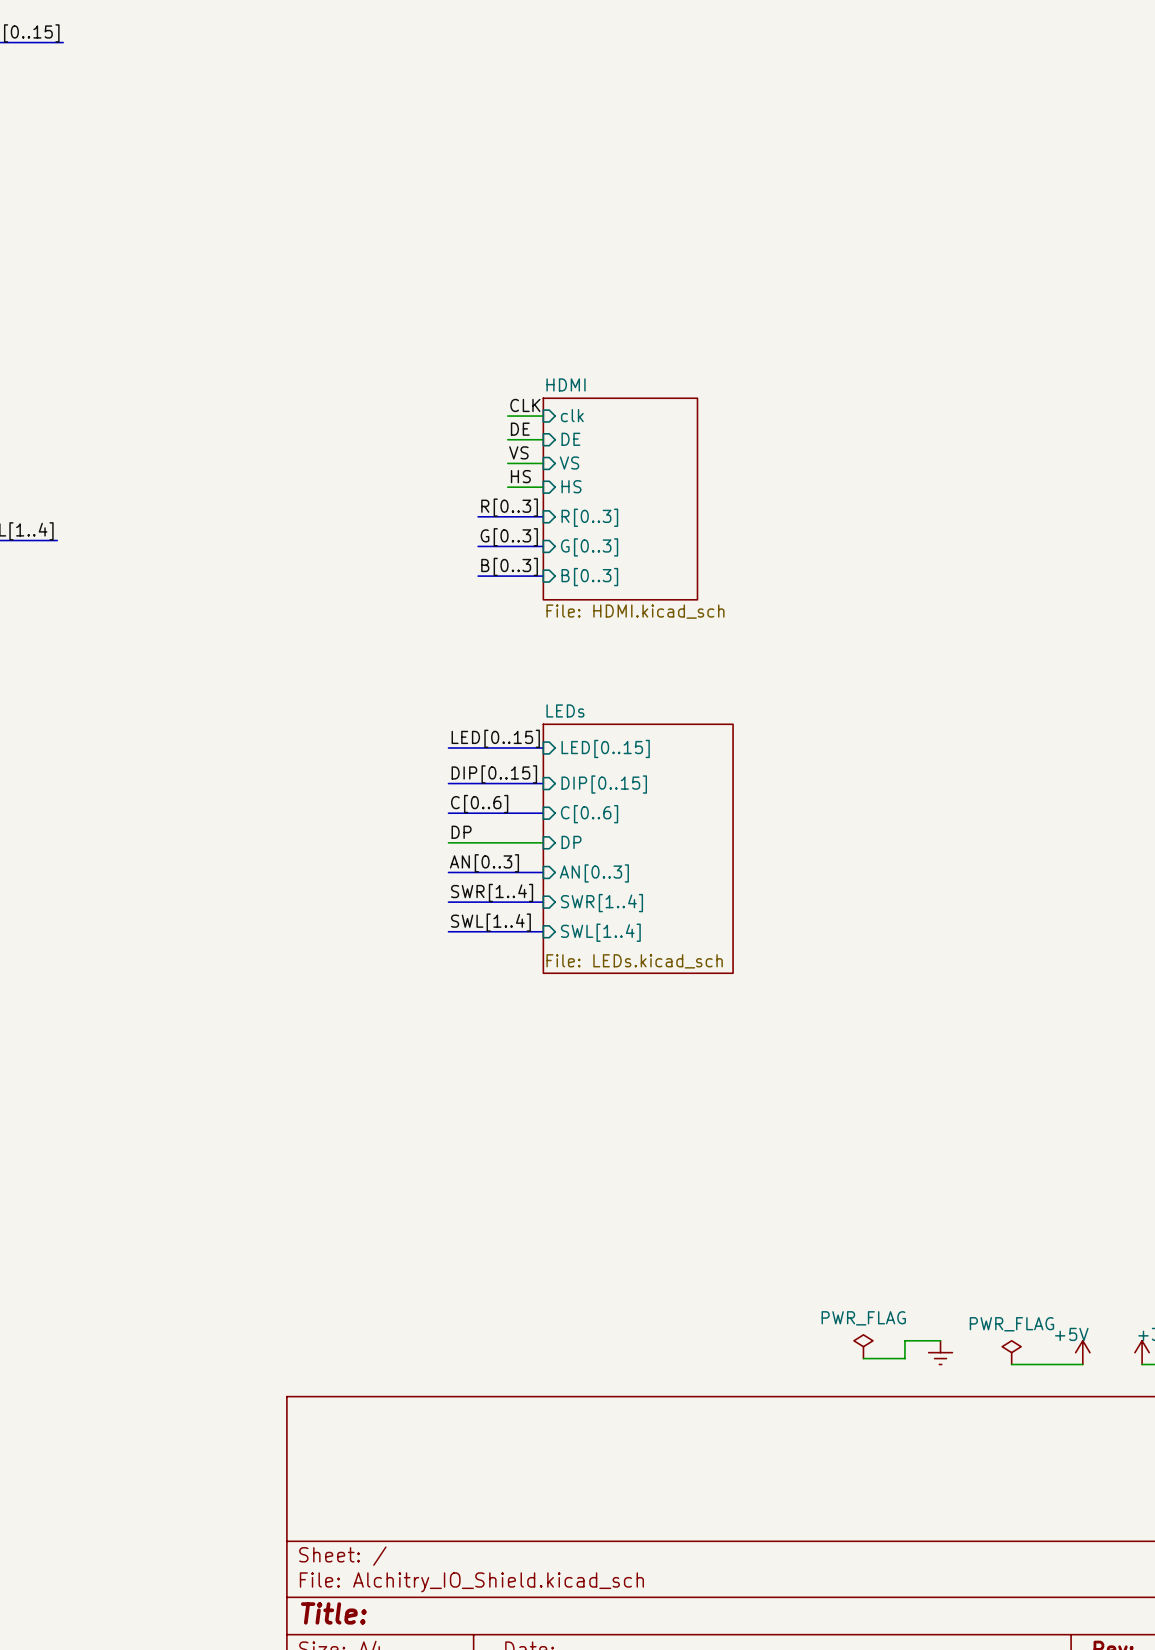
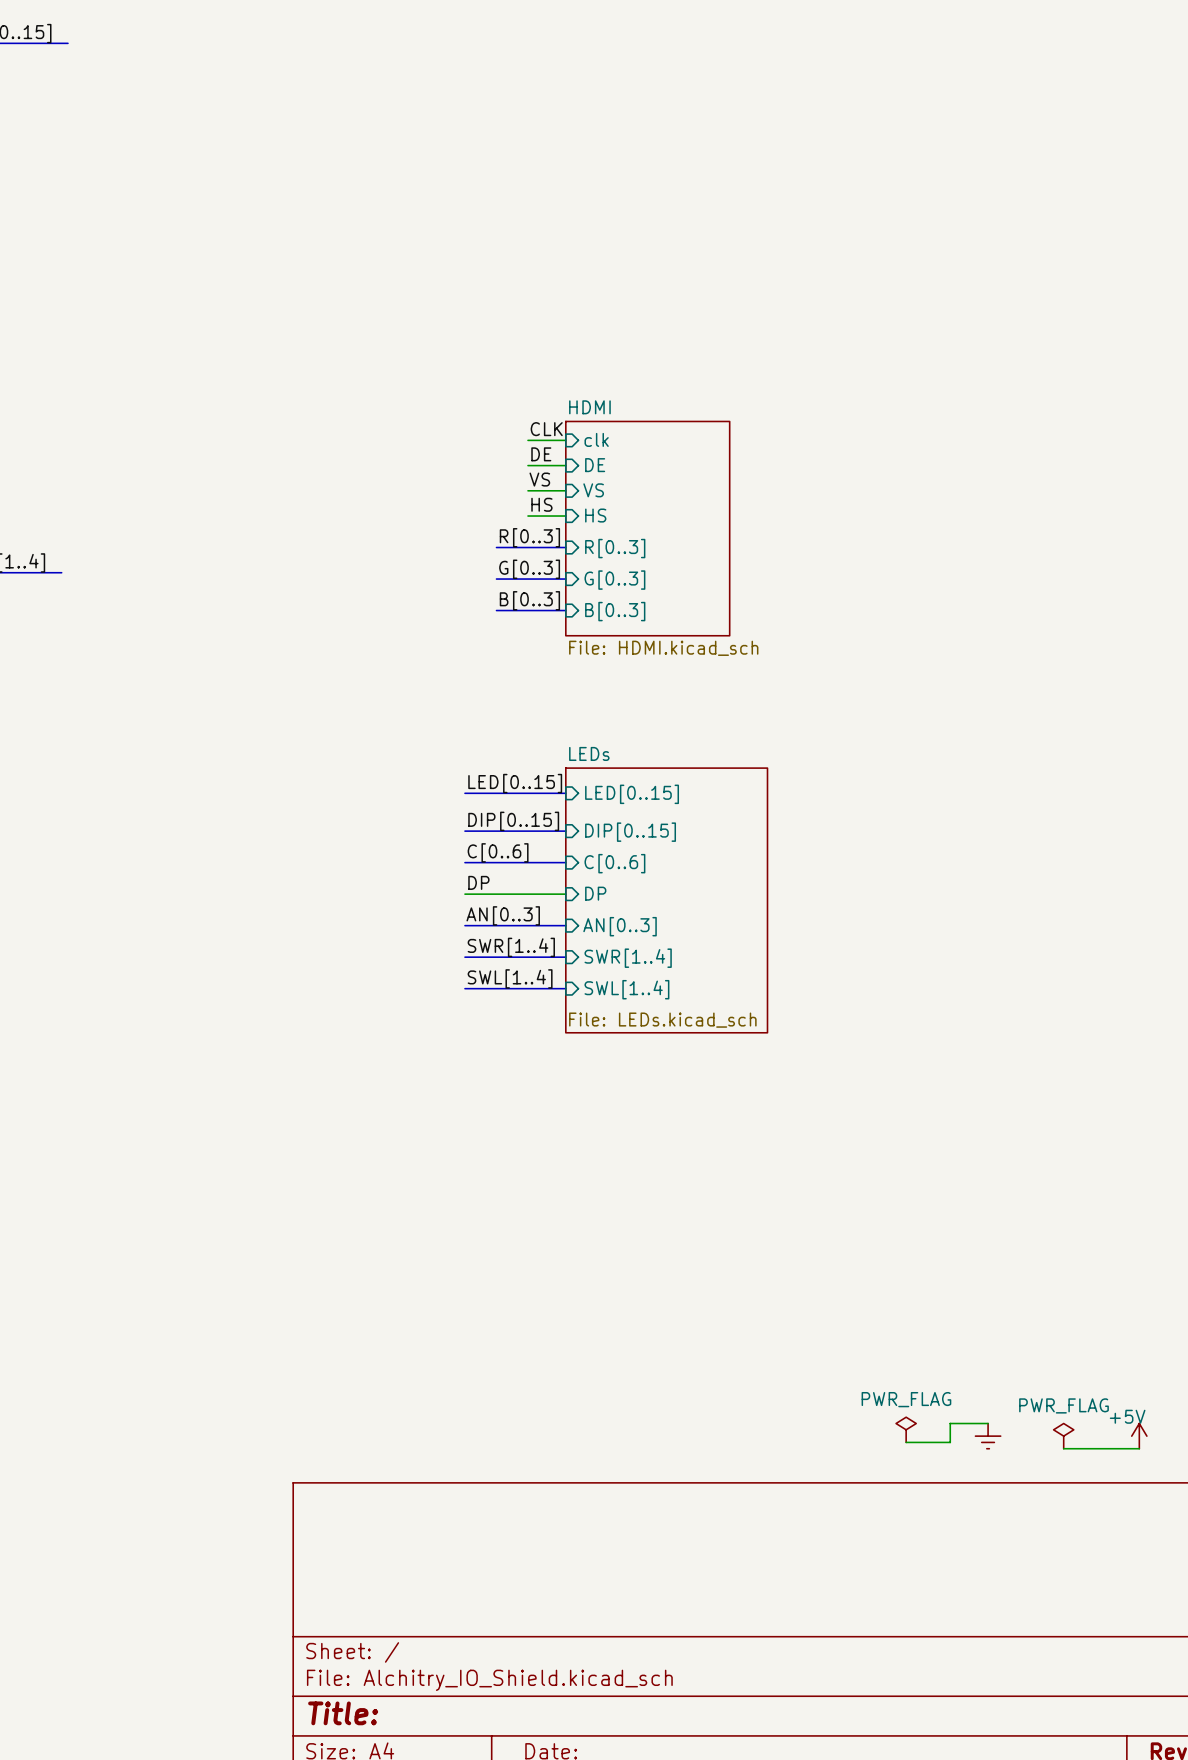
bus: none -> (55, 43) (67, 43)
bus: none -> (49, 572) (61, 572)

